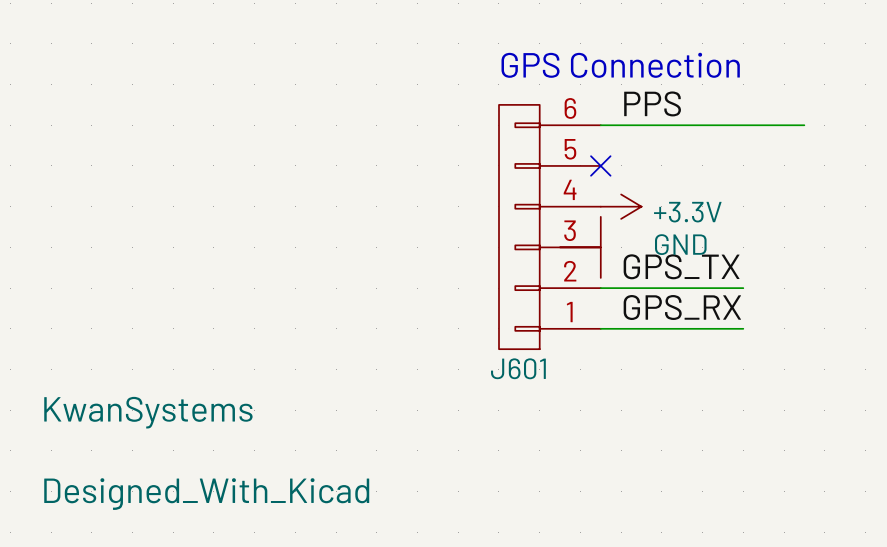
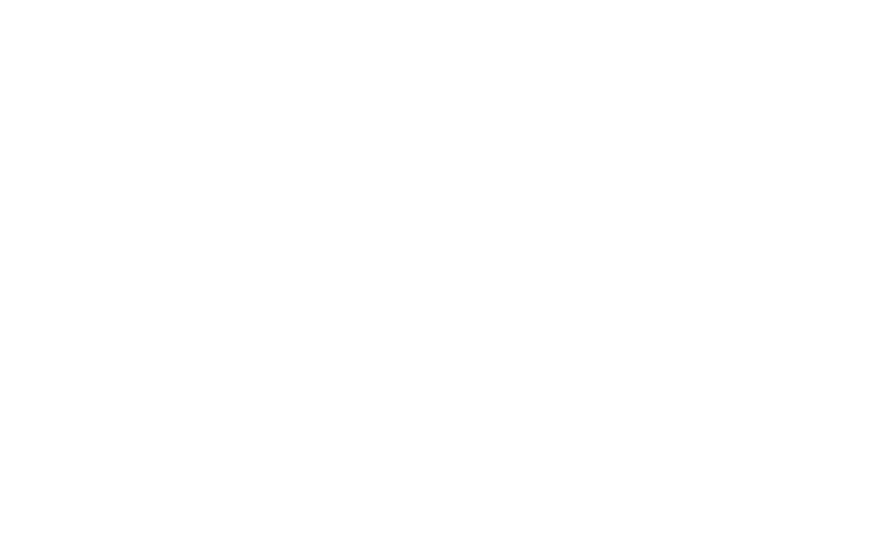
text: GPS Connection (620, 65) -> none
label: PPS (652, 103) -> none
wire: (600, 125) (804, 125) -> none
no-connect mark: (600, 165) -> none
power symbol: +3.3V (621, 206) -> none
J601: (549, 227) -> none
power symbol: GND (580, 247) -> none
label: GPS_TX (681, 266) -> none
wire: (600, 288) (743, 288) -> none
label: GPS_RX (682, 307) -> none
wire: (600, 328) (743, 328) -> none
part: KwanSystems (148, 412) -> none
part: Designed_With_Kicad (206, 494) -> none

